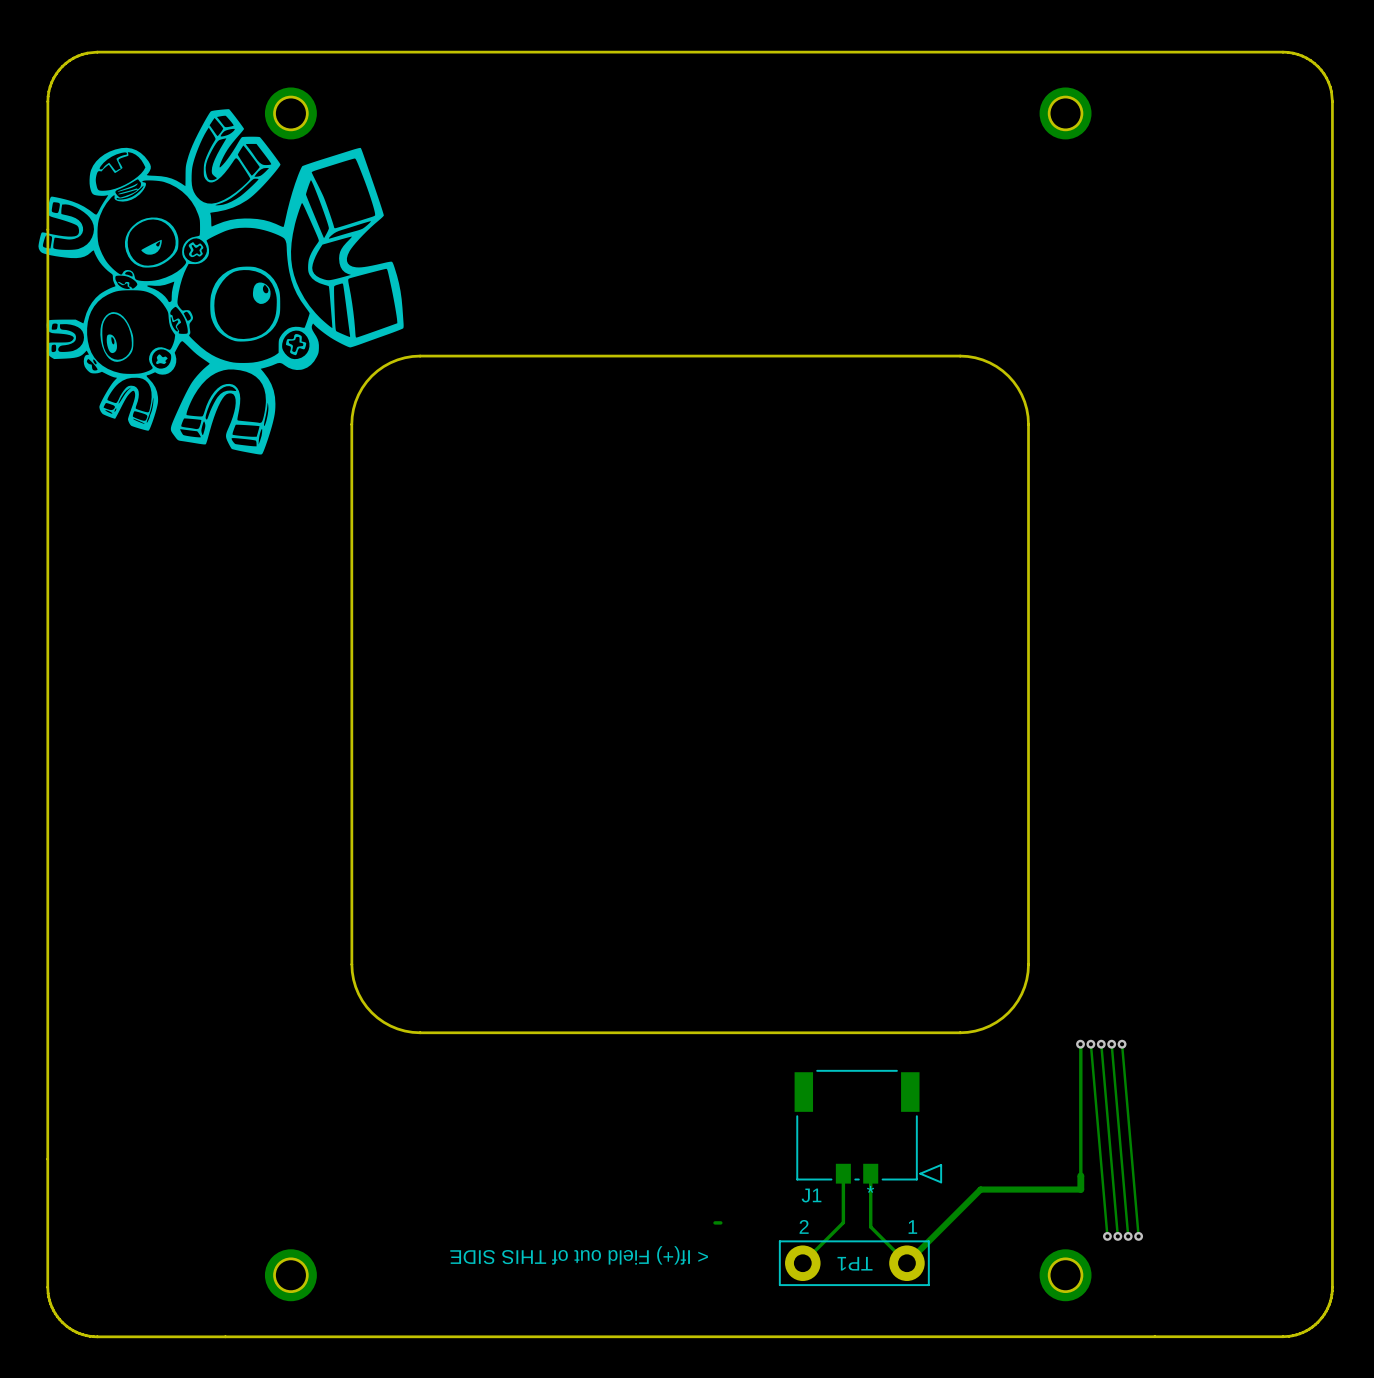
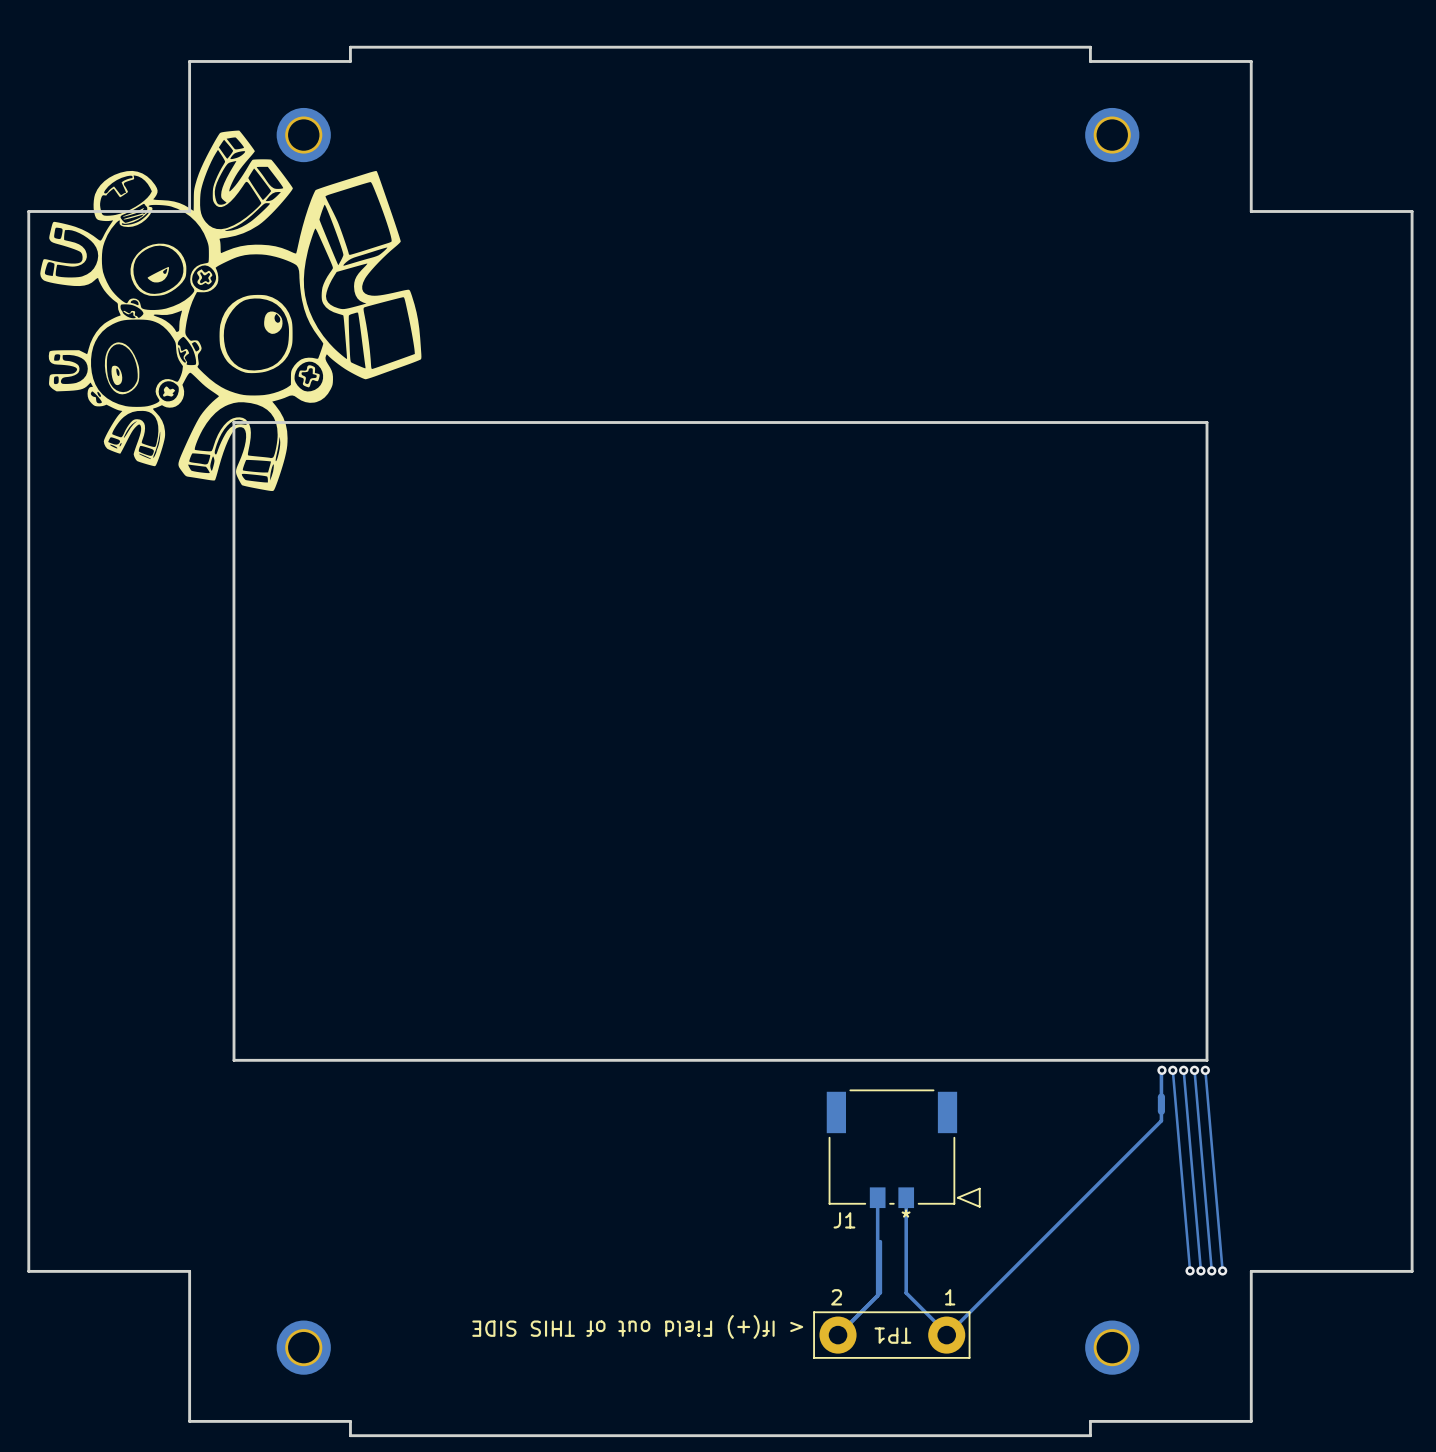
board edge: (1282, 52) (97, 52) (78, 56) (62, 66) (51, 82) (47, 101) (47, 1159) (48, 1293) (53, 1310) (62, 1322) (76, 1332) (93, 1336) (225, 1336) (1282, 1336) (1303, 1332) (1317, 1322) (1329, 1305) (1332, 1287) (1332, 101) (1328, 82) (1317, 66) (1302, 56) (1282, 52) -> (1090, 47) (1090, 61) (1251, 61) (1251, 211) (1412, 211) (1412, 1271) (1251, 1271) (1251, 1421) (1090, 1421) (1090, 1435) (350, 1435) (350, 1421) (189, 1421) (189, 1271) (28, 1271) (28, 211) (189, 211) (189, 61) (350, 61) (350, 47) (1090, 47)
board edge: (960, 356) (420, 356) (404, 357) (390, 362) (377, 370) (366, 381) (355, 401) (351, 424) (351, 964) (353, 979) (358, 994) (366, 1007) (377, 1017) (397, 1028) (420, 1032) (960, 1032) (975, 1031) (989, 1026) (1002, 1017) (1013, 1007) (1024, 987) (1028, 964) (1028, 416) (1021, 394) (1008, 376) (989, 362) (975, 357) (960, 356) -> (1207, 422) (1207, 1060) (234, 1060) (233, 422) (1207, 422)
track: none -> (1161, 1070) (1161, 1096)
via: none -> (1161, 1070)
via: none -> (1172, 1070)
via: none -> (1183, 1070)
via: none -> (1194, 1070)
via: none -> (1205, 1070)
track: (1080, 1044) (1080, 1175) -> none
via: (1080, 1044) -> none
track: (1090, 1044) (1107, 1236) -> (1172, 1070) (1190, 1270)
via: (1090, 1044) -> none
track: (1101, 1044) (1117, 1236) -> (1183, 1070) (1200, 1270)
via: (1101, 1044) -> none
track: (1111, 1044) (1128, 1236) -> (1194, 1070) (1211, 1270)
via: (1111, 1044) -> none
track: (1122, 1044) (1138, 1236) -> (1205, 1070) (1222, 1270)
via: (1122, 1044) -> none
track: none -> (1161, 1111) (1161, 1120) (947, 1334) (906, 1293) (906, 1197)
J1 position: (868, 1126) -> (903, 1148)
track: none -> (877, 1197) (877, 1295) (839, 1334)
track: (870, 1173) (870, 1226) (906, 1263) (980, 1189) (1080, 1189) -> none
part position: (1080, 1182) -> (1161, 1104)
via: none -> (1190, 1270)
via: none -> (1200, 1270)
via: none -> (1211, 1270)
via: none -> (1222, 1270)
track: (720, 1222) (715, 1222) -> none
via: (1107, 1236) -> none
via: (1117, 1236) -> none
via: (1128, 1236) -> none
via: (1138, 1236) -> none

